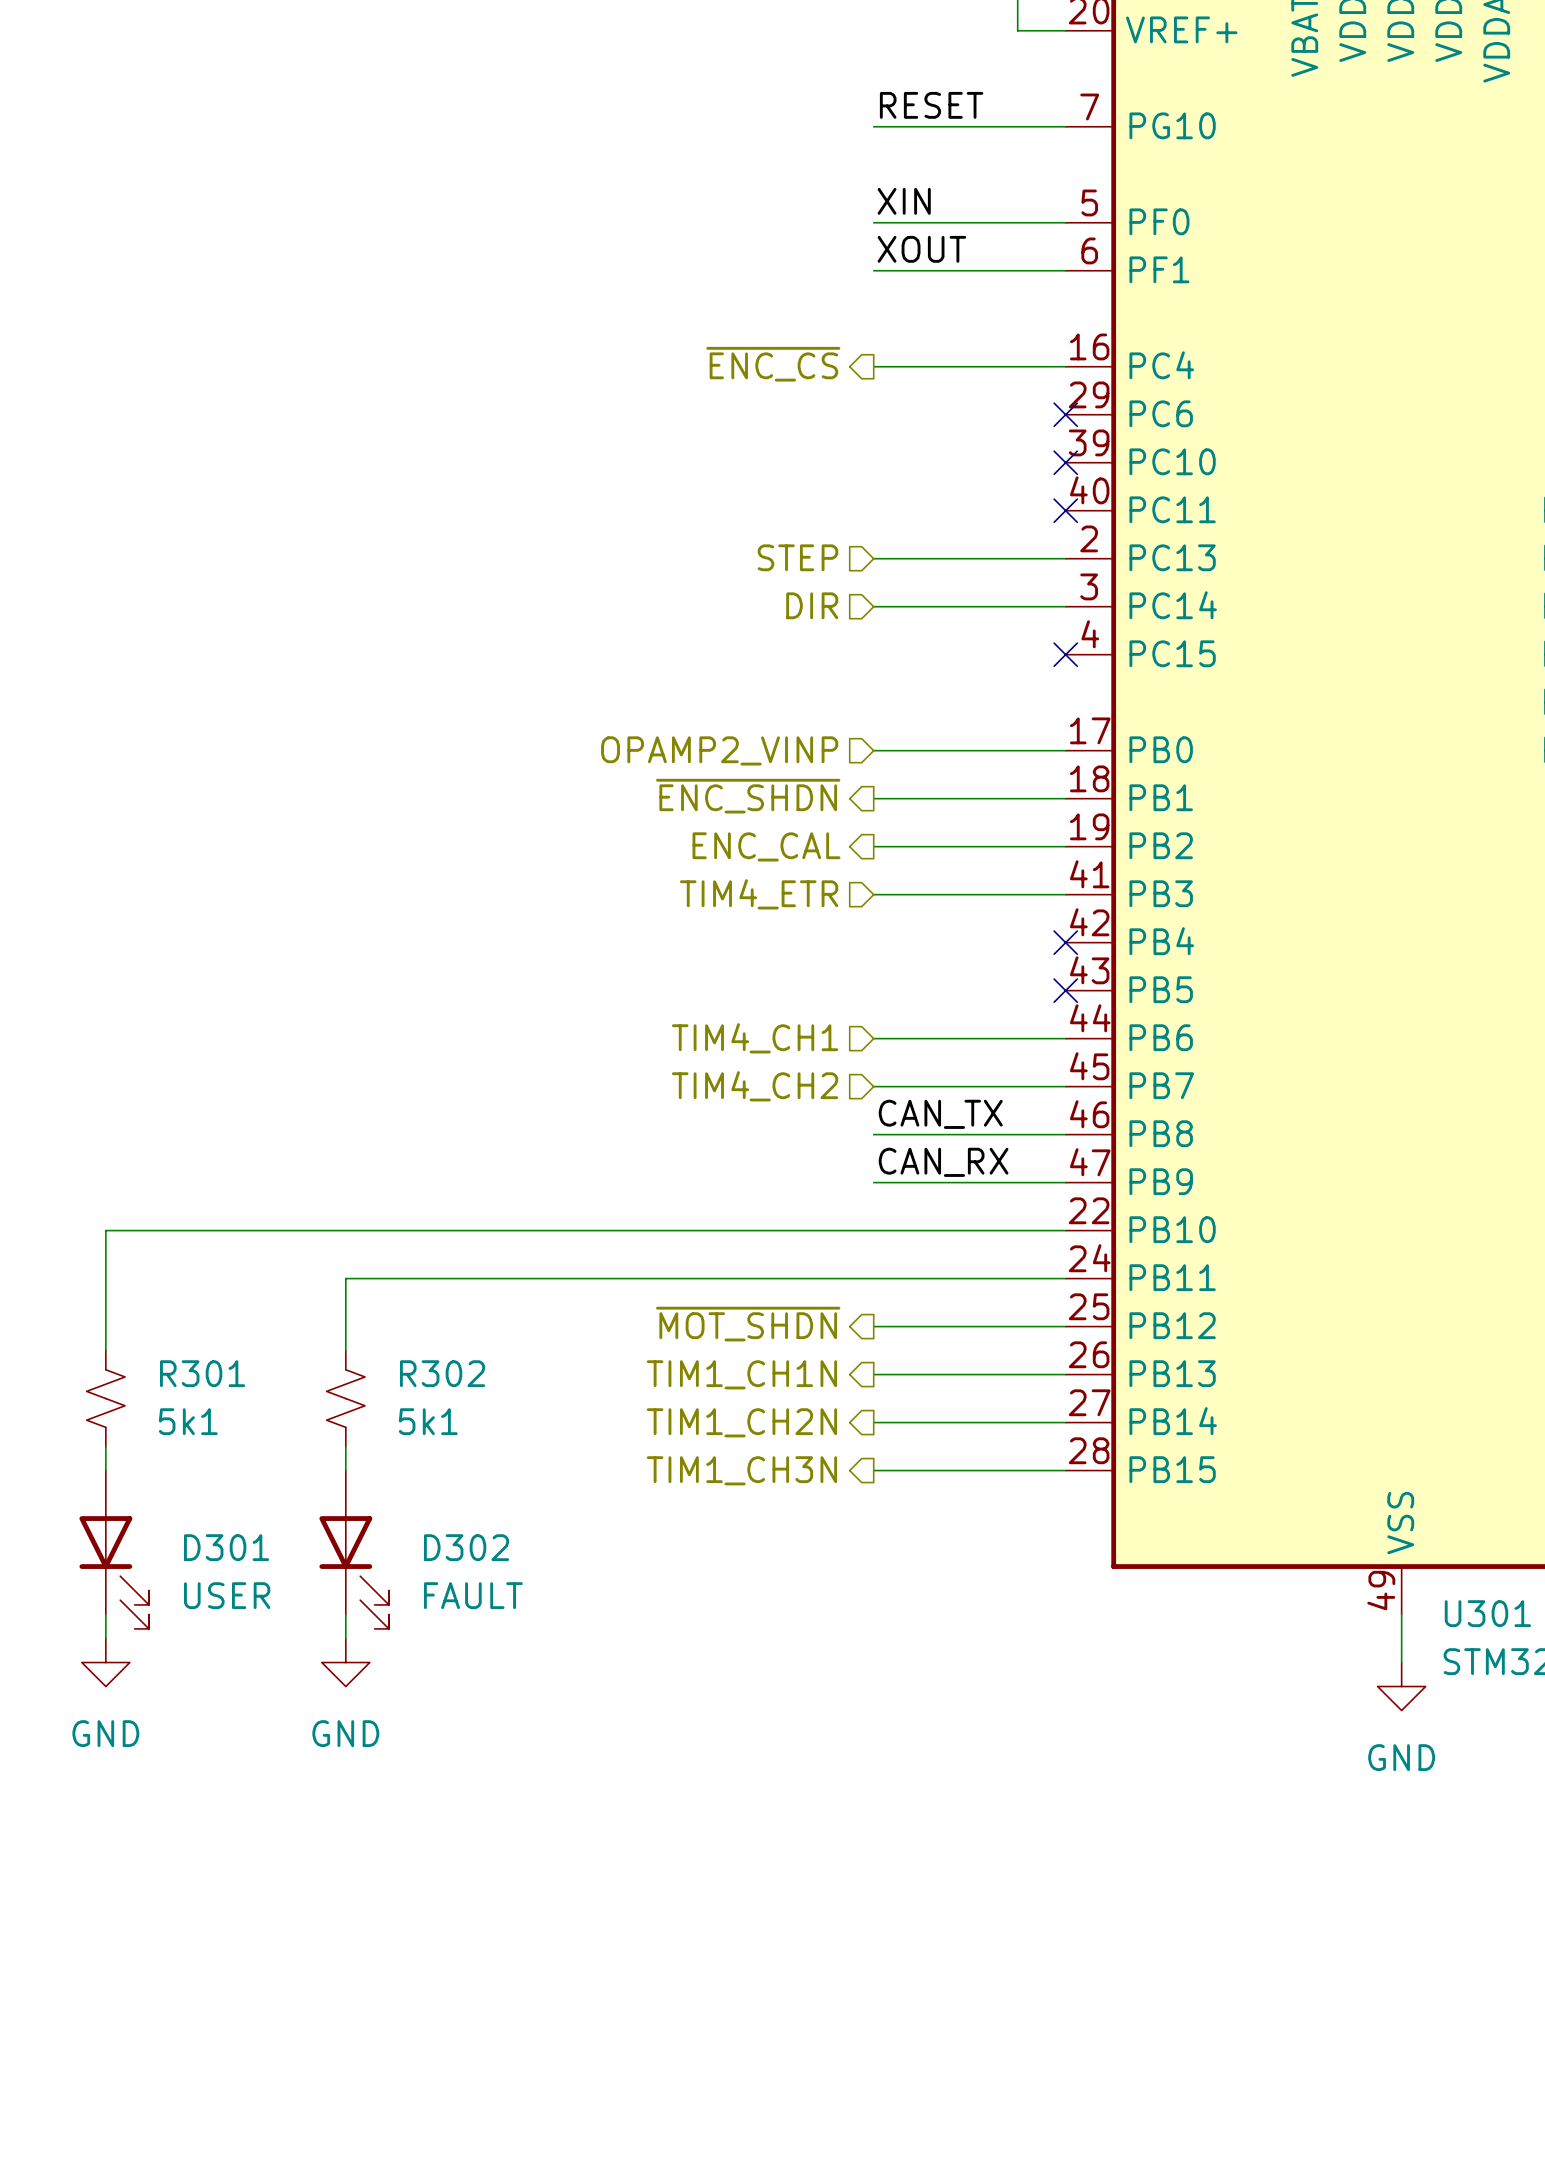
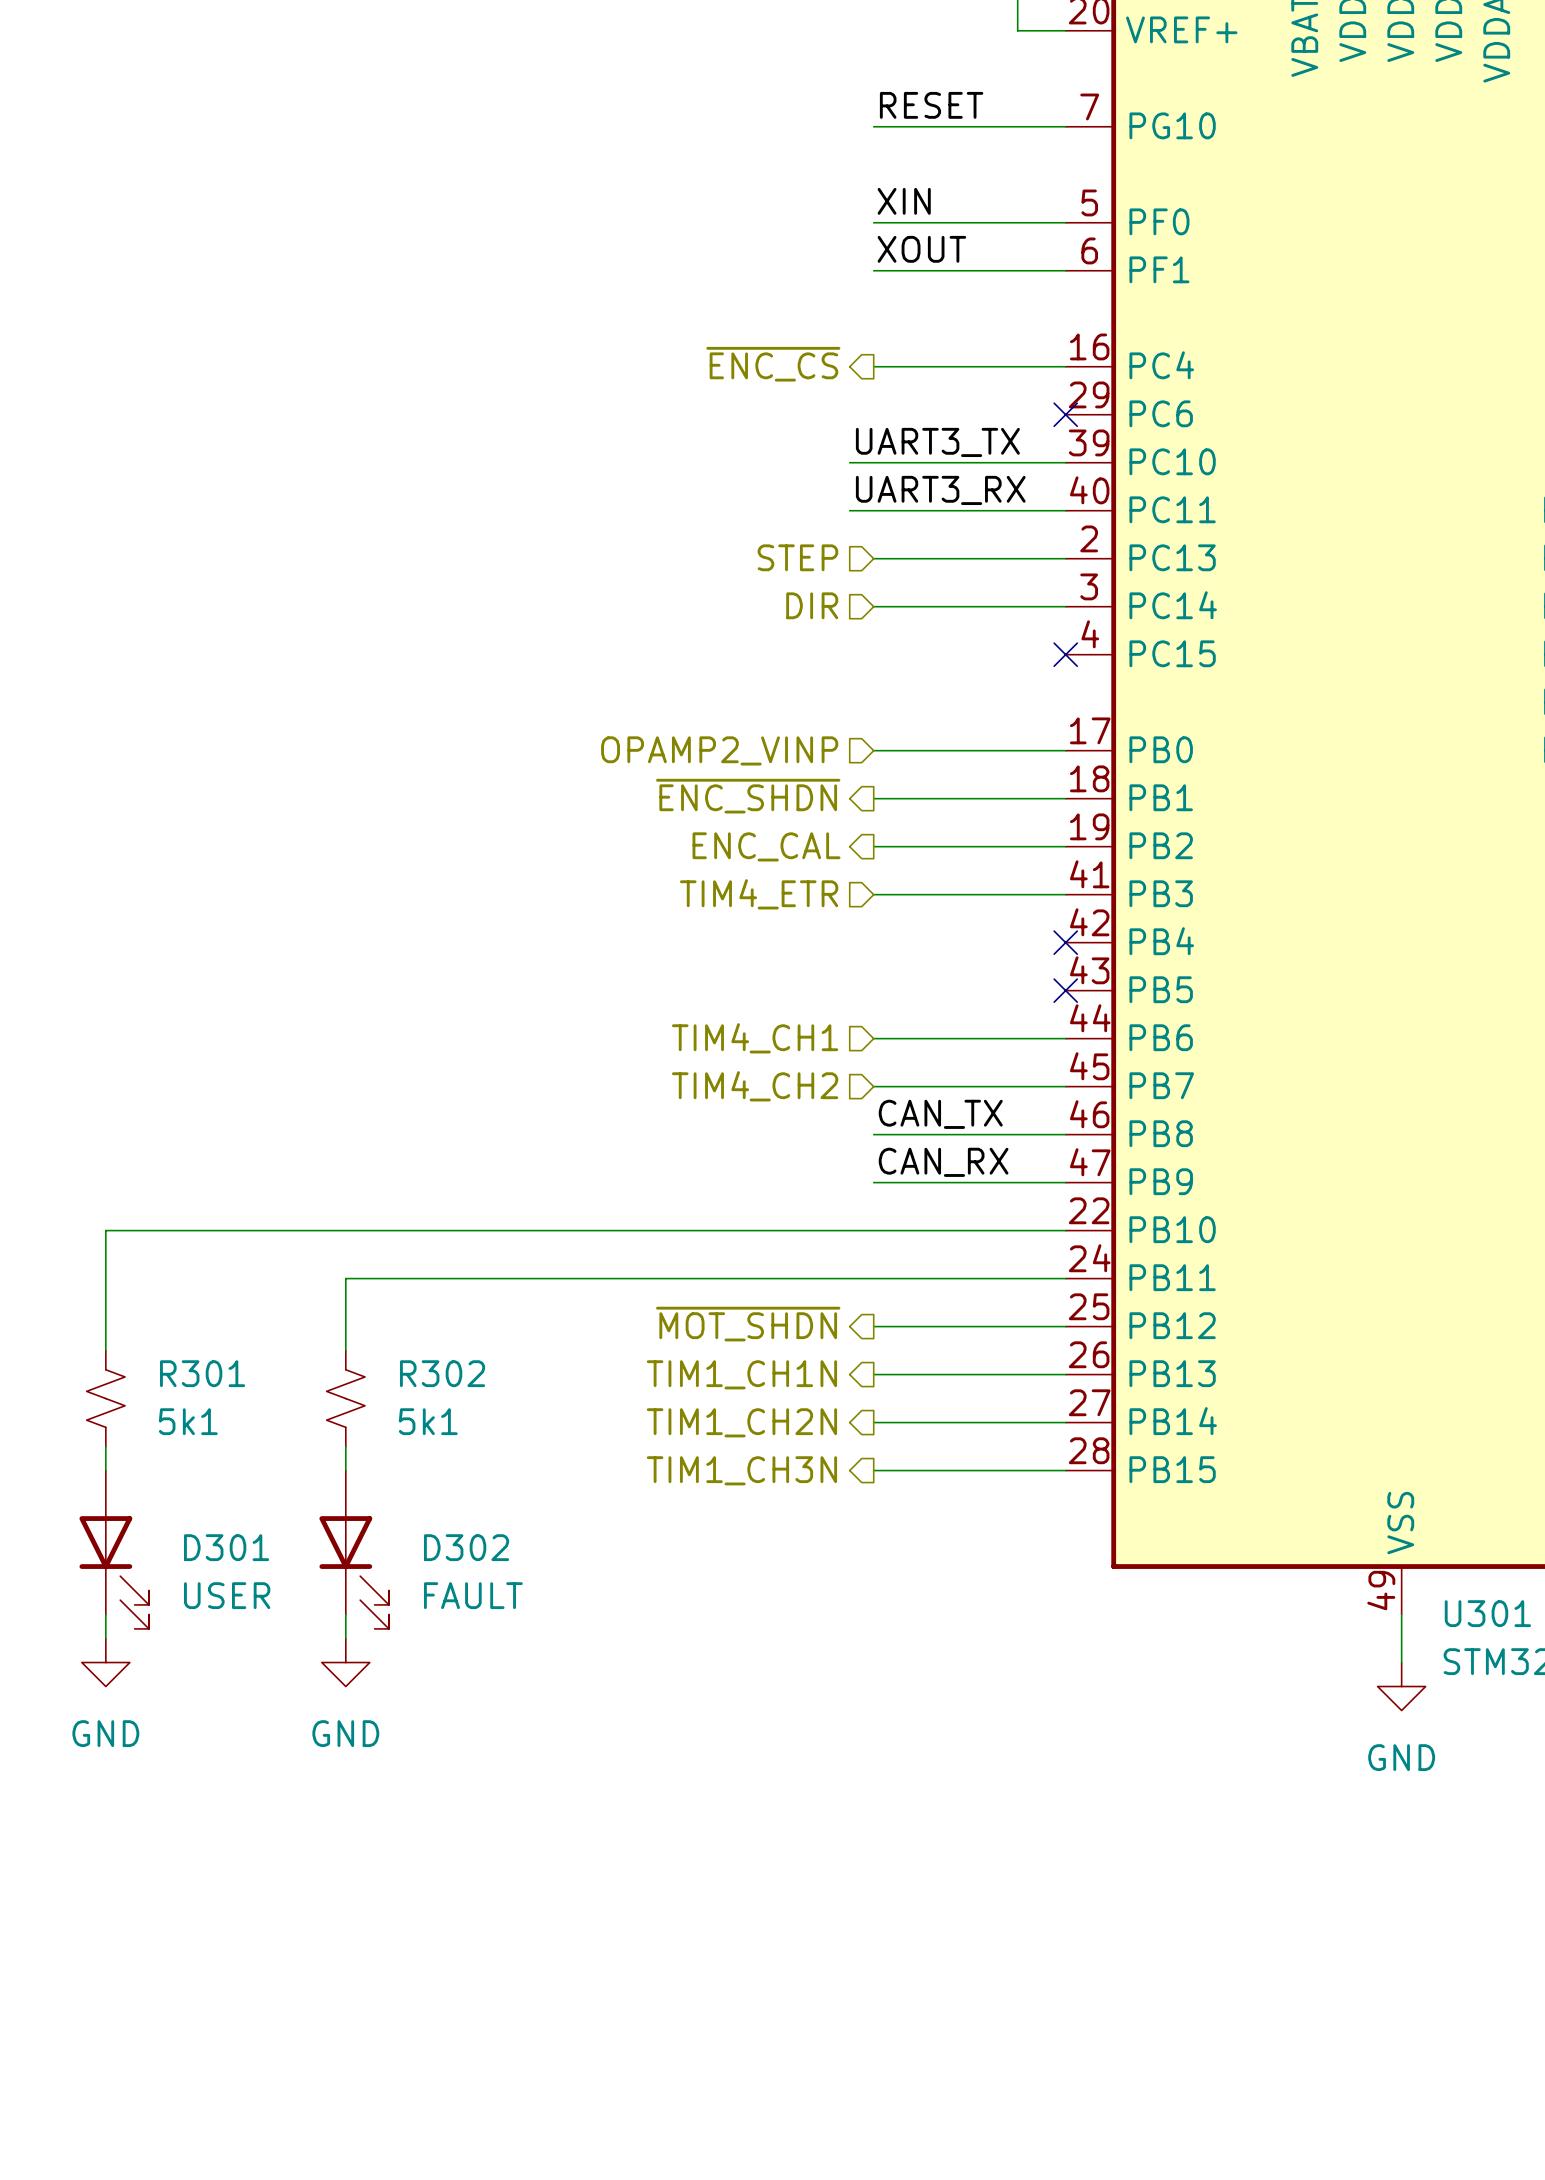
label: none -> UART3_TX (937, 442)
wire: none -> (849, 462) (1065, 462)
no-connect mark: (1065, 462) -> none
label: none -> UART3_RX (940, 490)
wire: none -> (849, 510) (1065, 510)
no-connect mark: (1065, 510) -> none

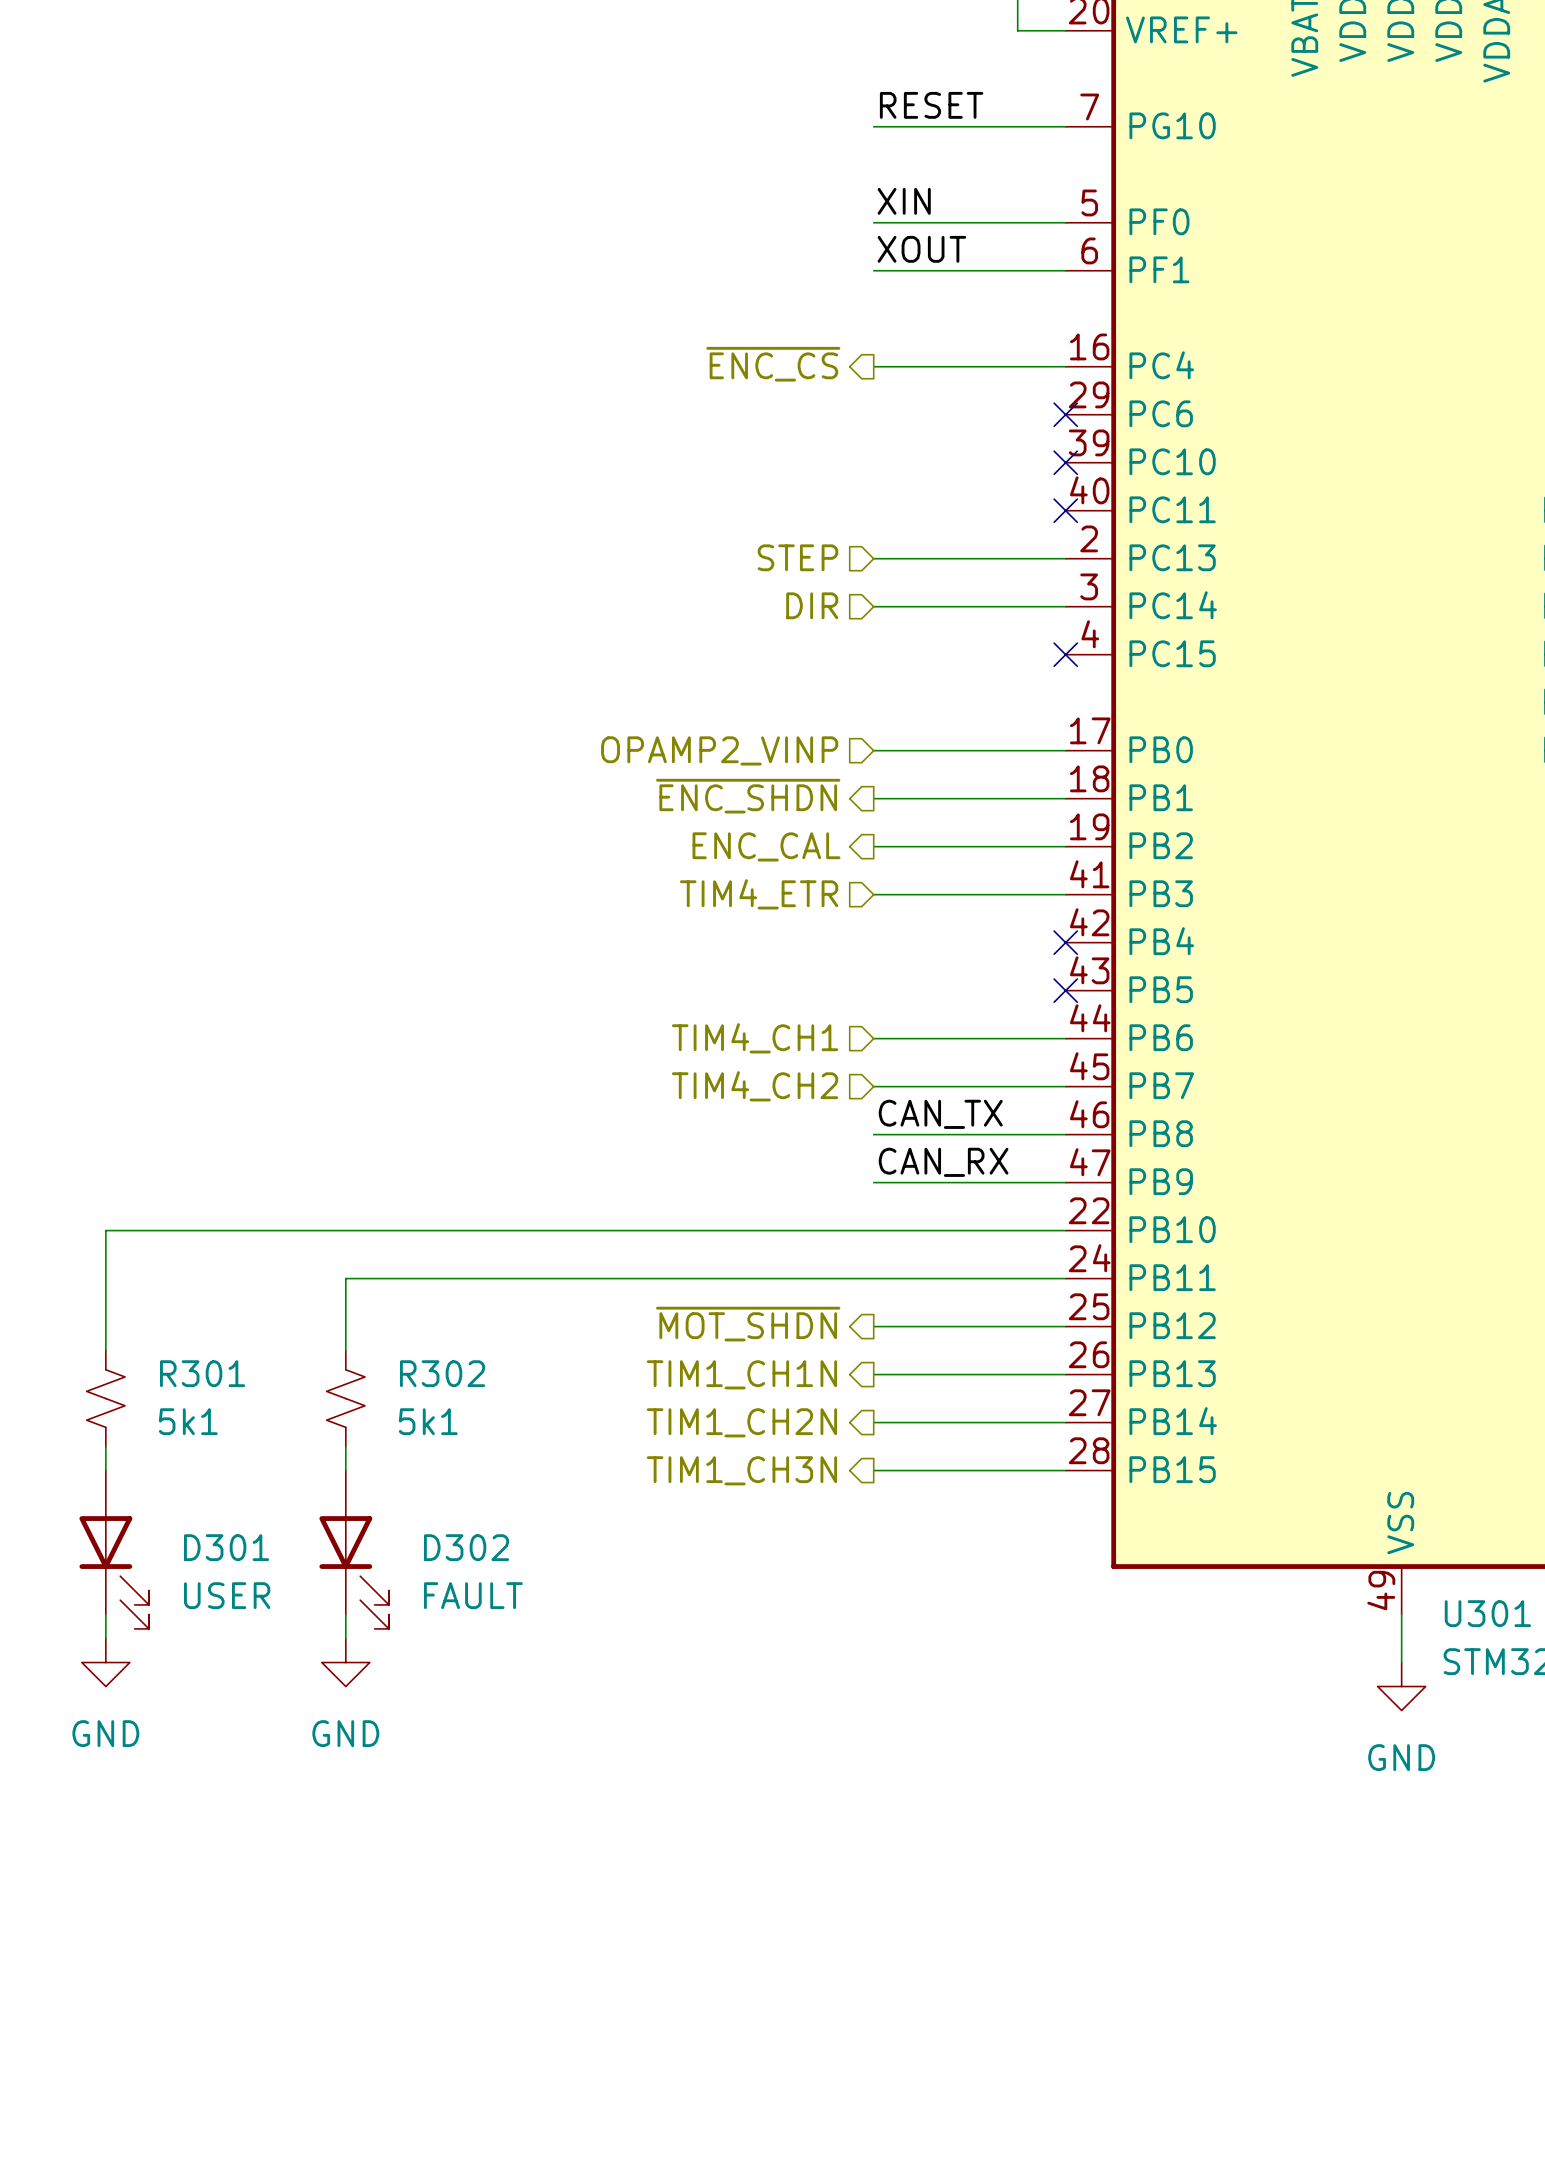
label: UART3_TX (937, 442) -> none
wire: (849, 462) (1065, 462) -> none
no-connect mark: none -> (1065, 462)
label: UART3_RX (940, 490) -> none
wire: (849, 510) (1065, 510) -> none
no-connect mark: none -> (1065, 510)

